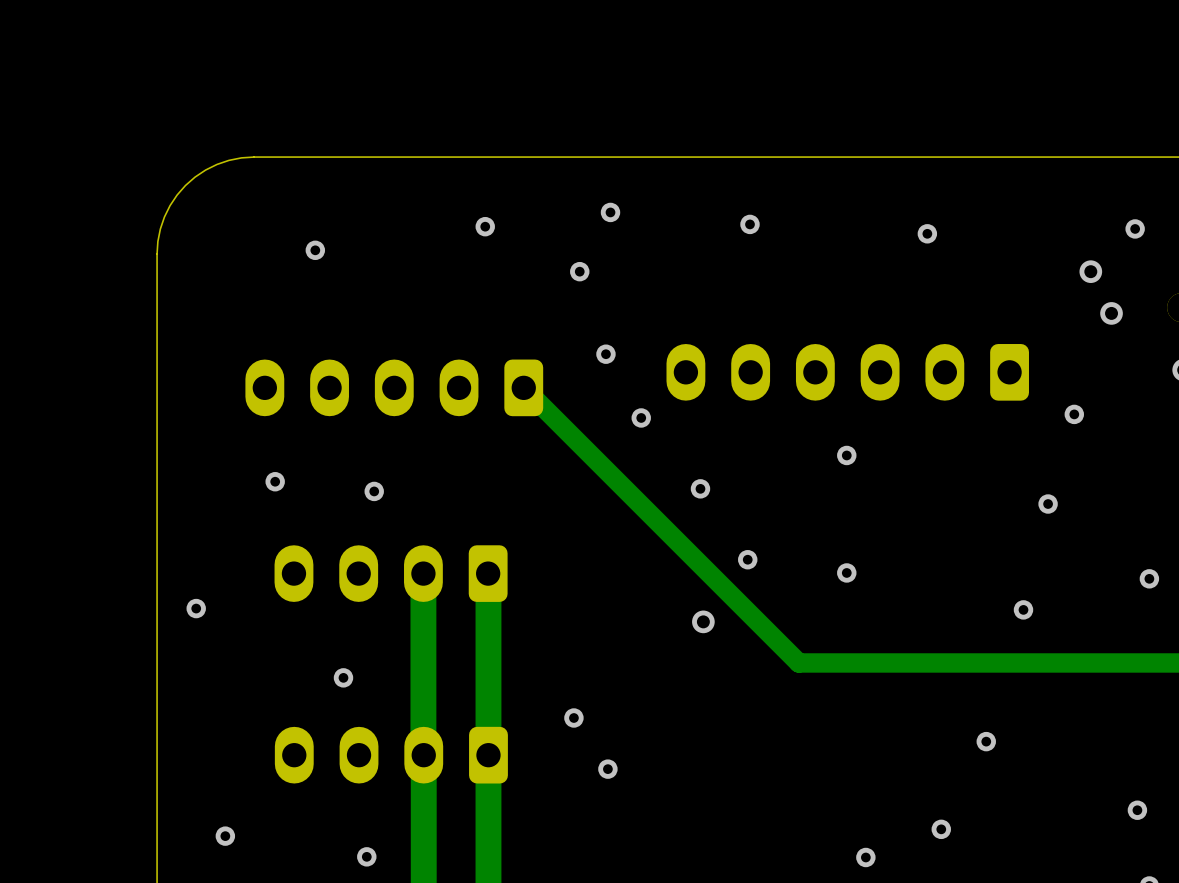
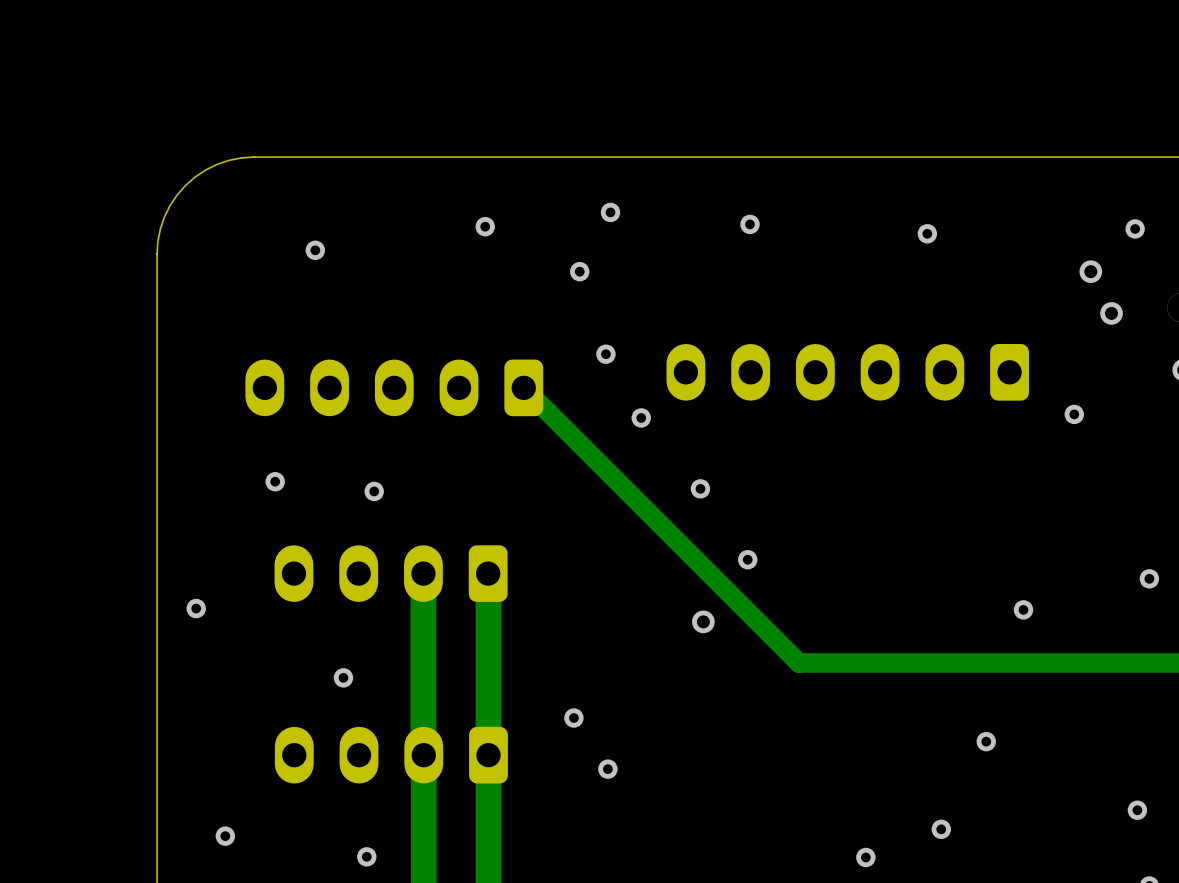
via: (846, 455) -> none
via: (1048, 504) -> none
via: (846, 572) -> none

